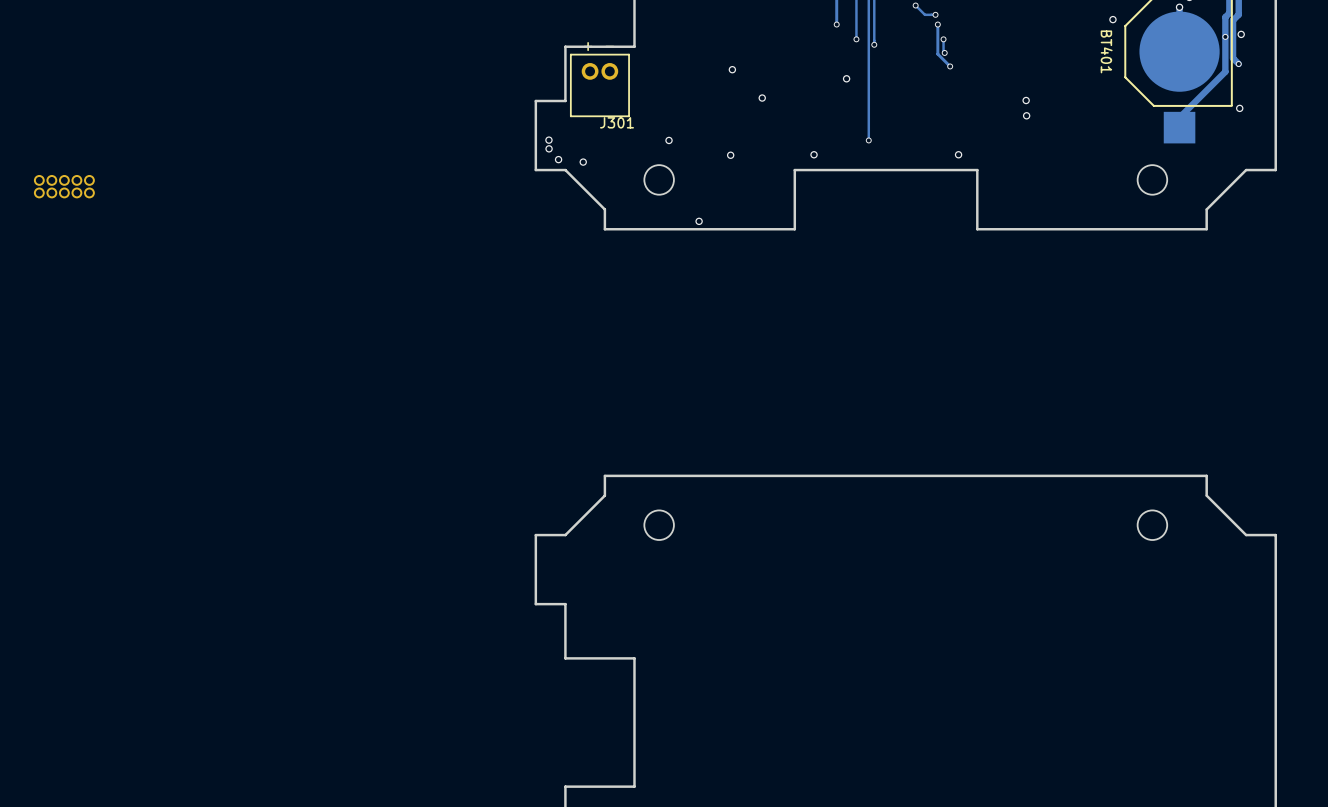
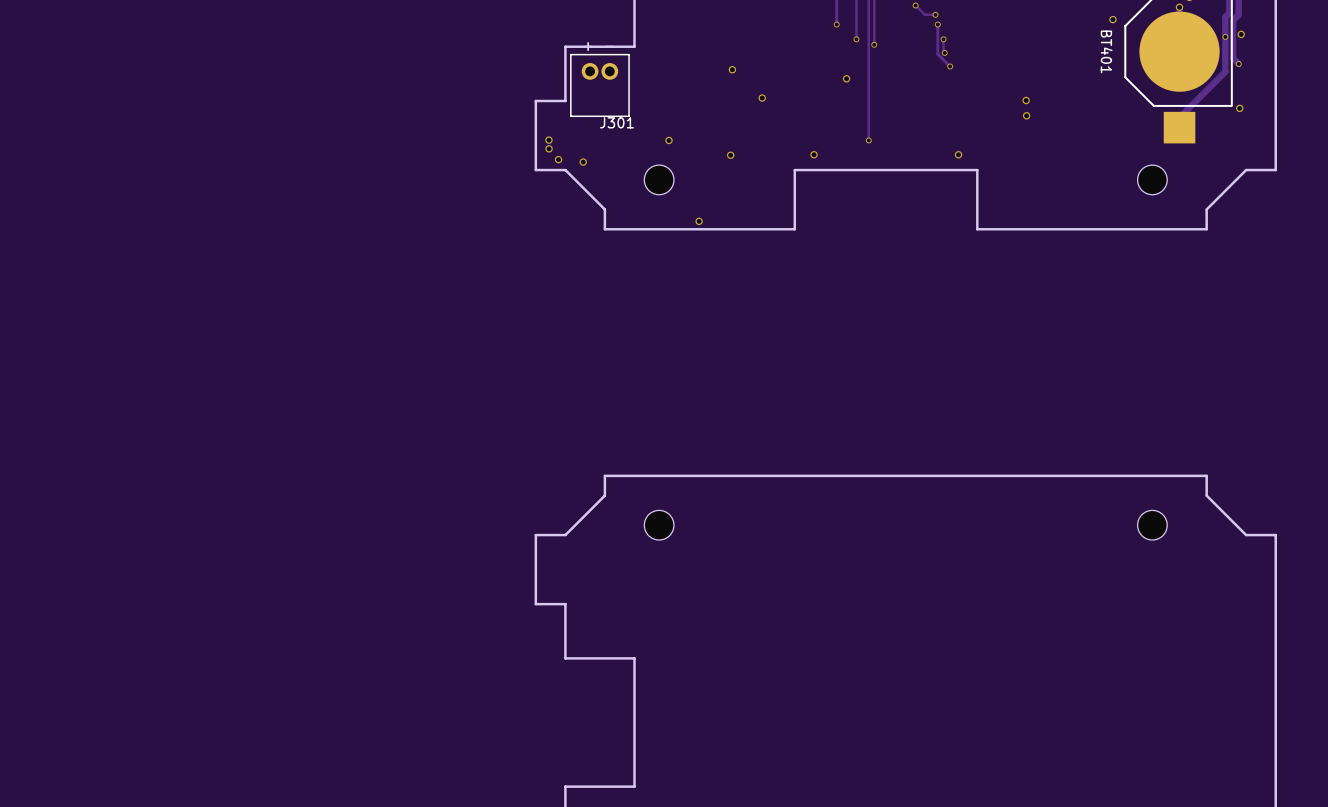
part: (64, 186) -> none

